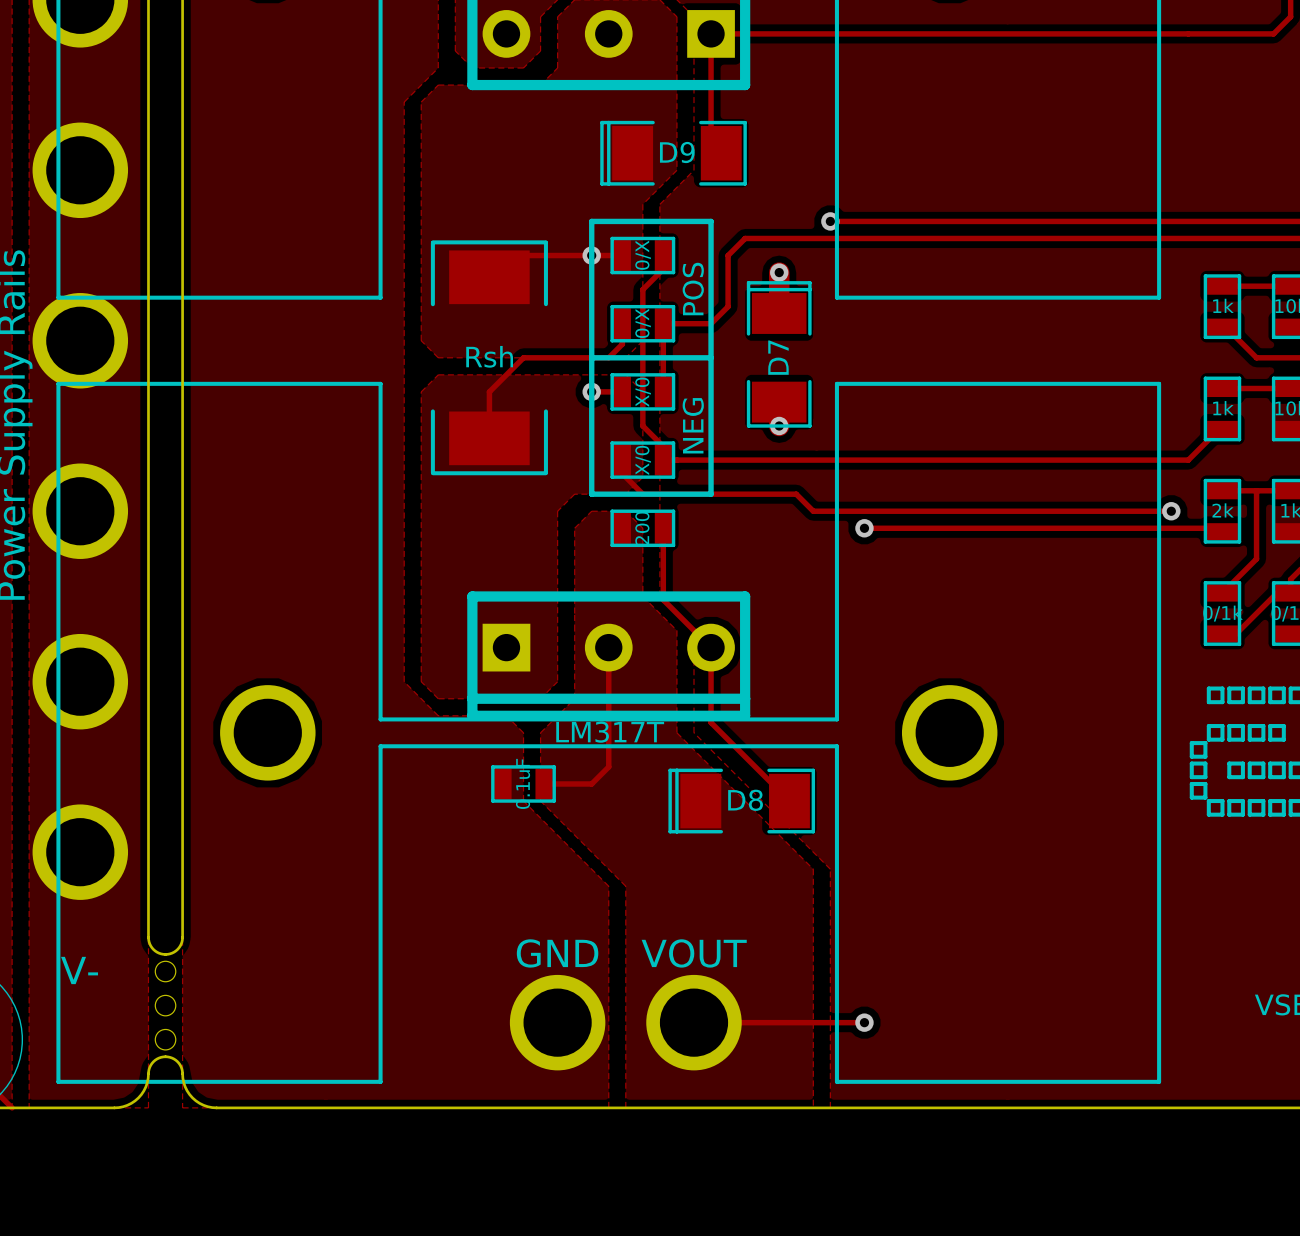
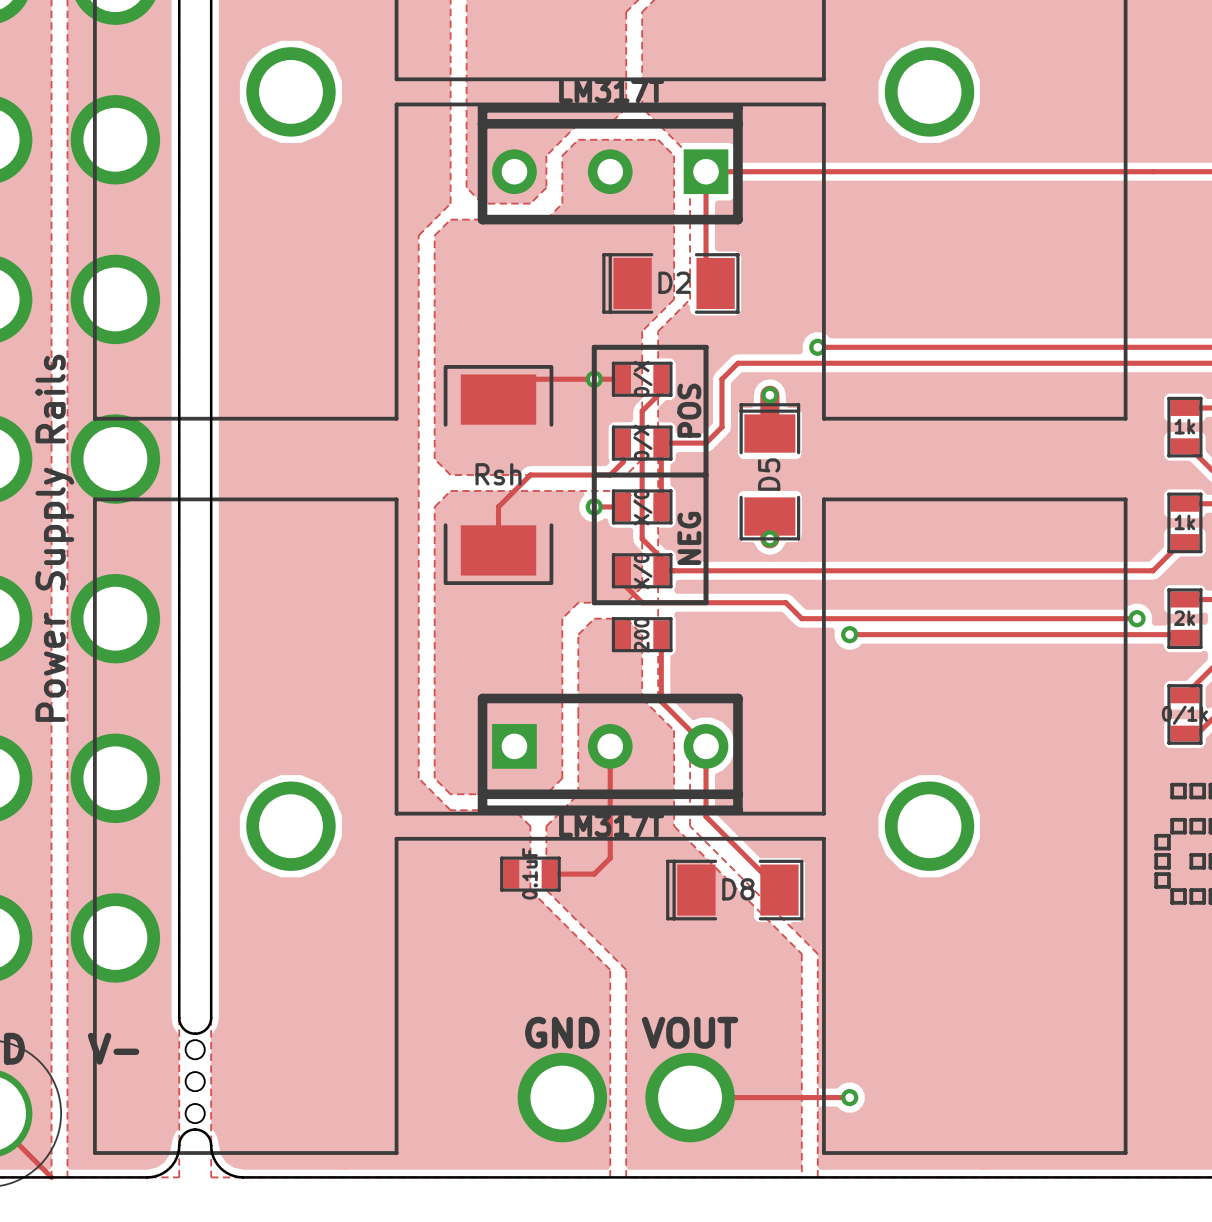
D9 name: D9 (677, 152) -> D2 (674, 282)
D7 name: D7 (778, 357) -> D5 (769, 474)

